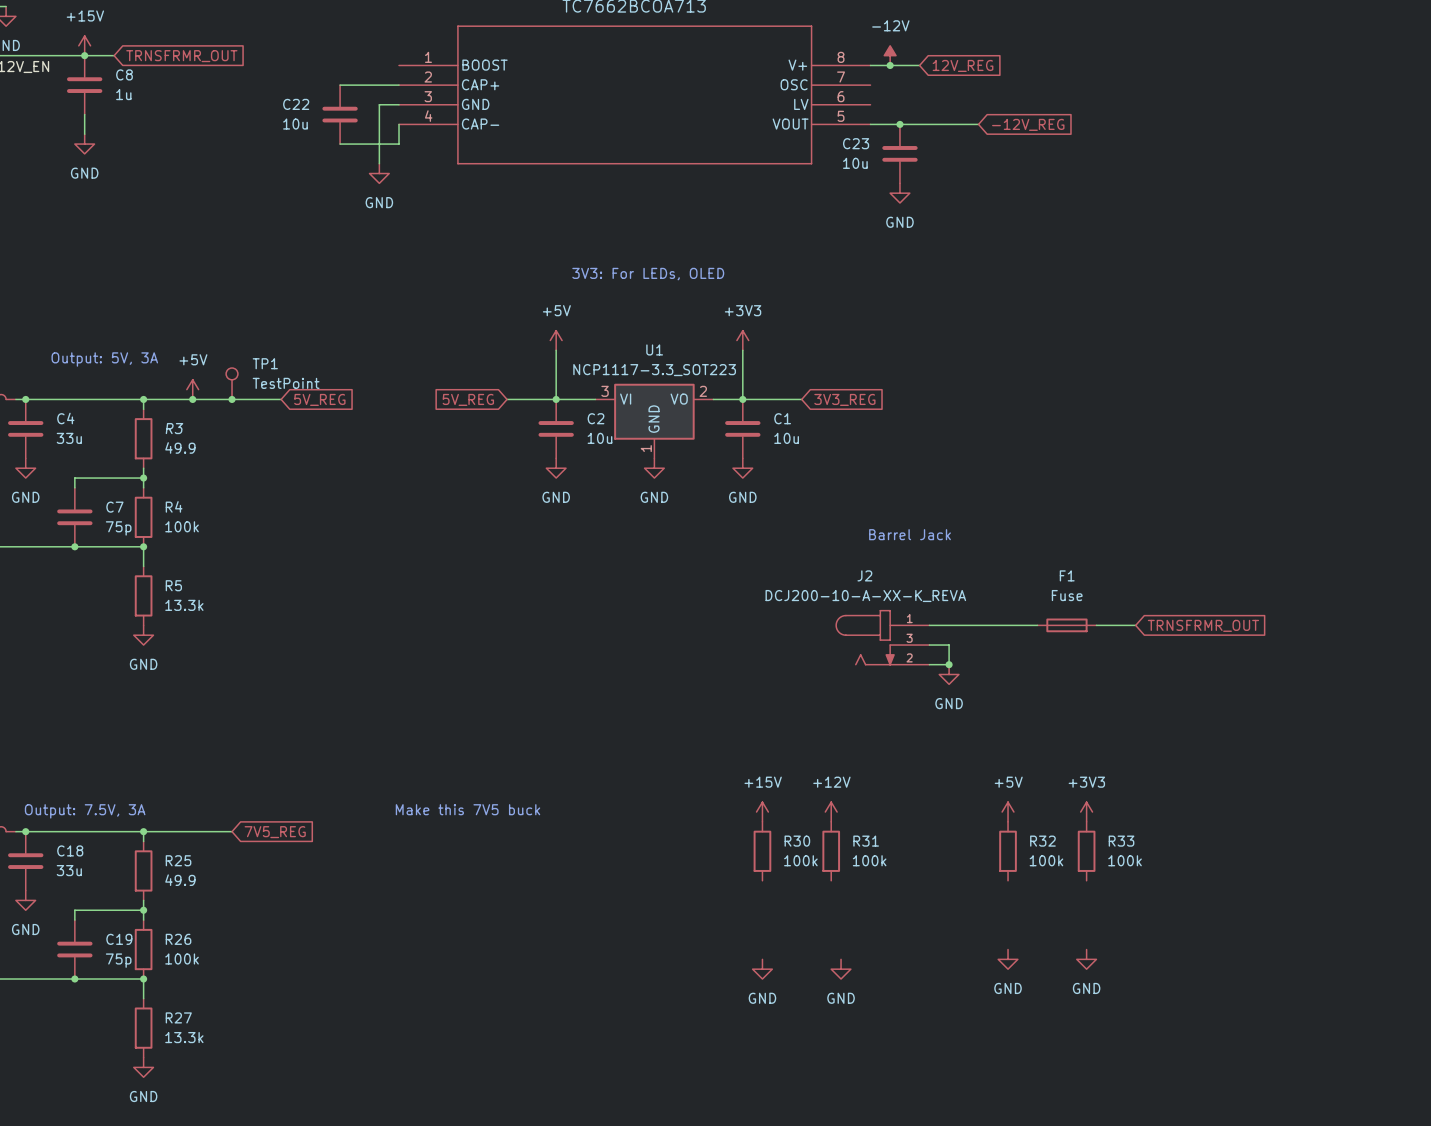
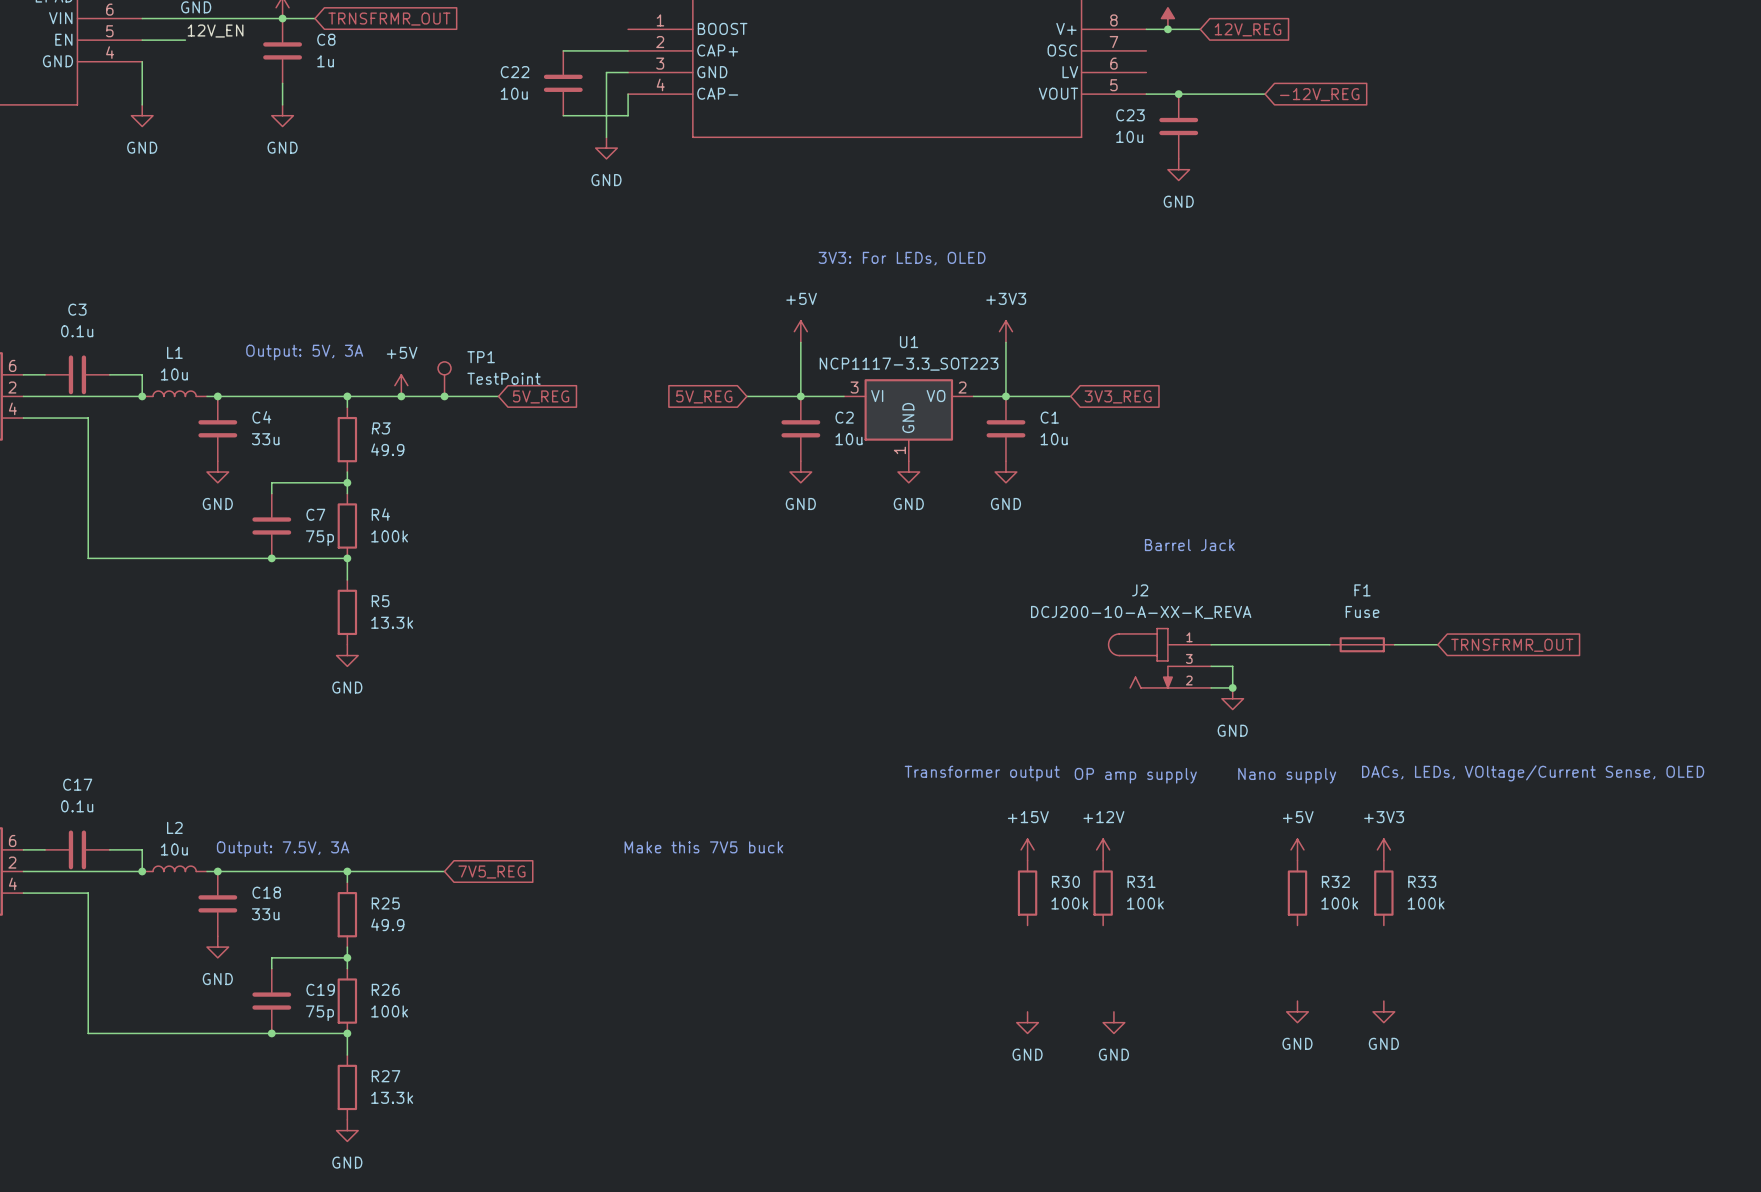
text: none -> Transformer output (982, 773)
text: none -> DACs, LEDs, VOltage/Current Sense, OLED (1533, 773)
text: none -> OP amp supply (1135, 775)
text: none -> Nano supply (1287, 775)

